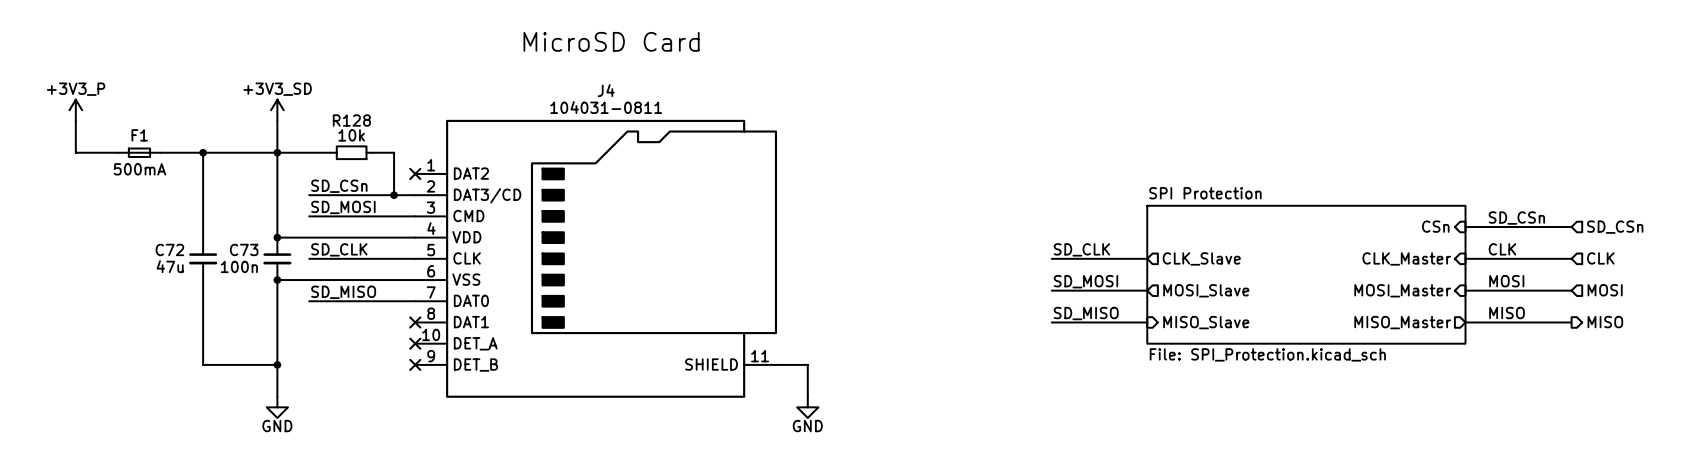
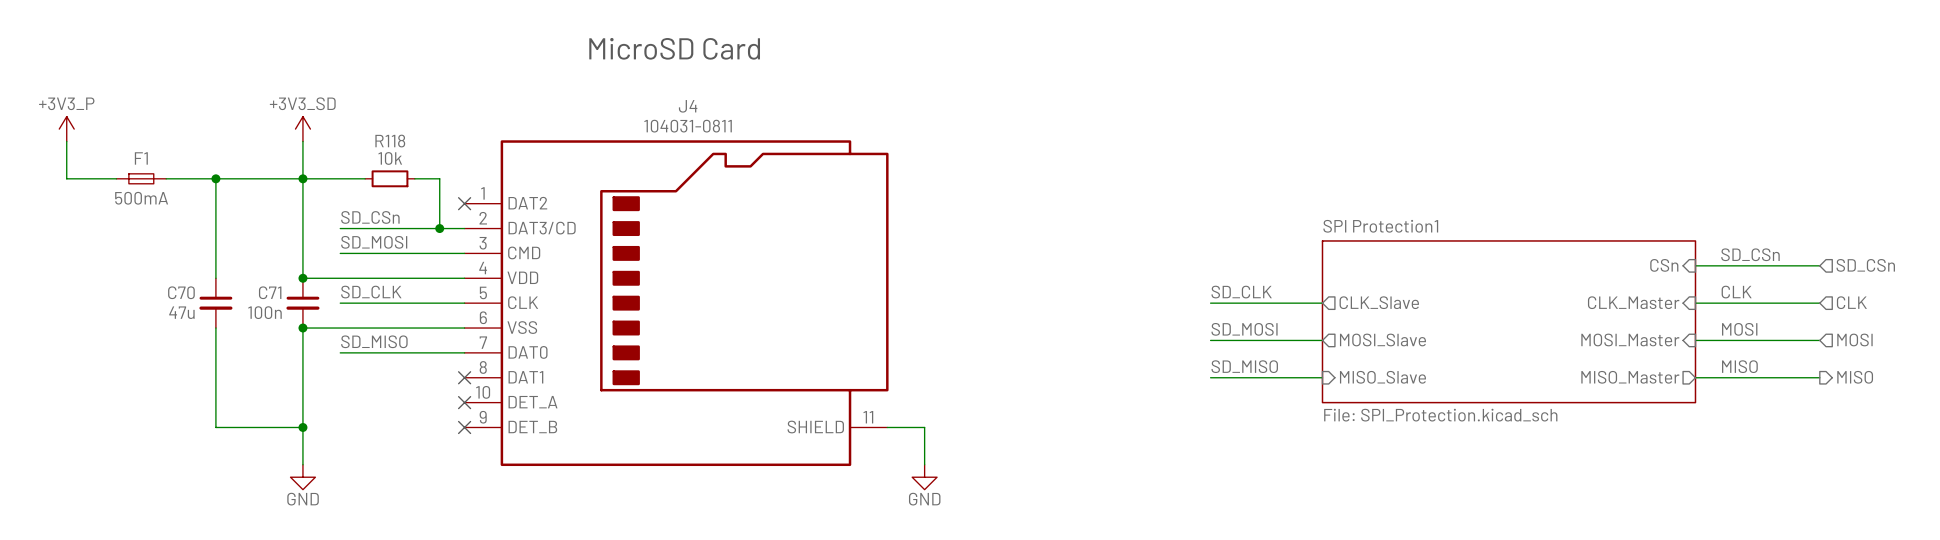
R128 name: R128 (351, 120) -> R118 (390, 141)
sheet SPI Protection name: SPI Protection (1205, 193) -> SPI Protection1 (1380, 226)
C72 name: C72 (169, 249) -> C70 (181, 292)
C73 name: C73 (244, 249) -> C71 (270, 292)

